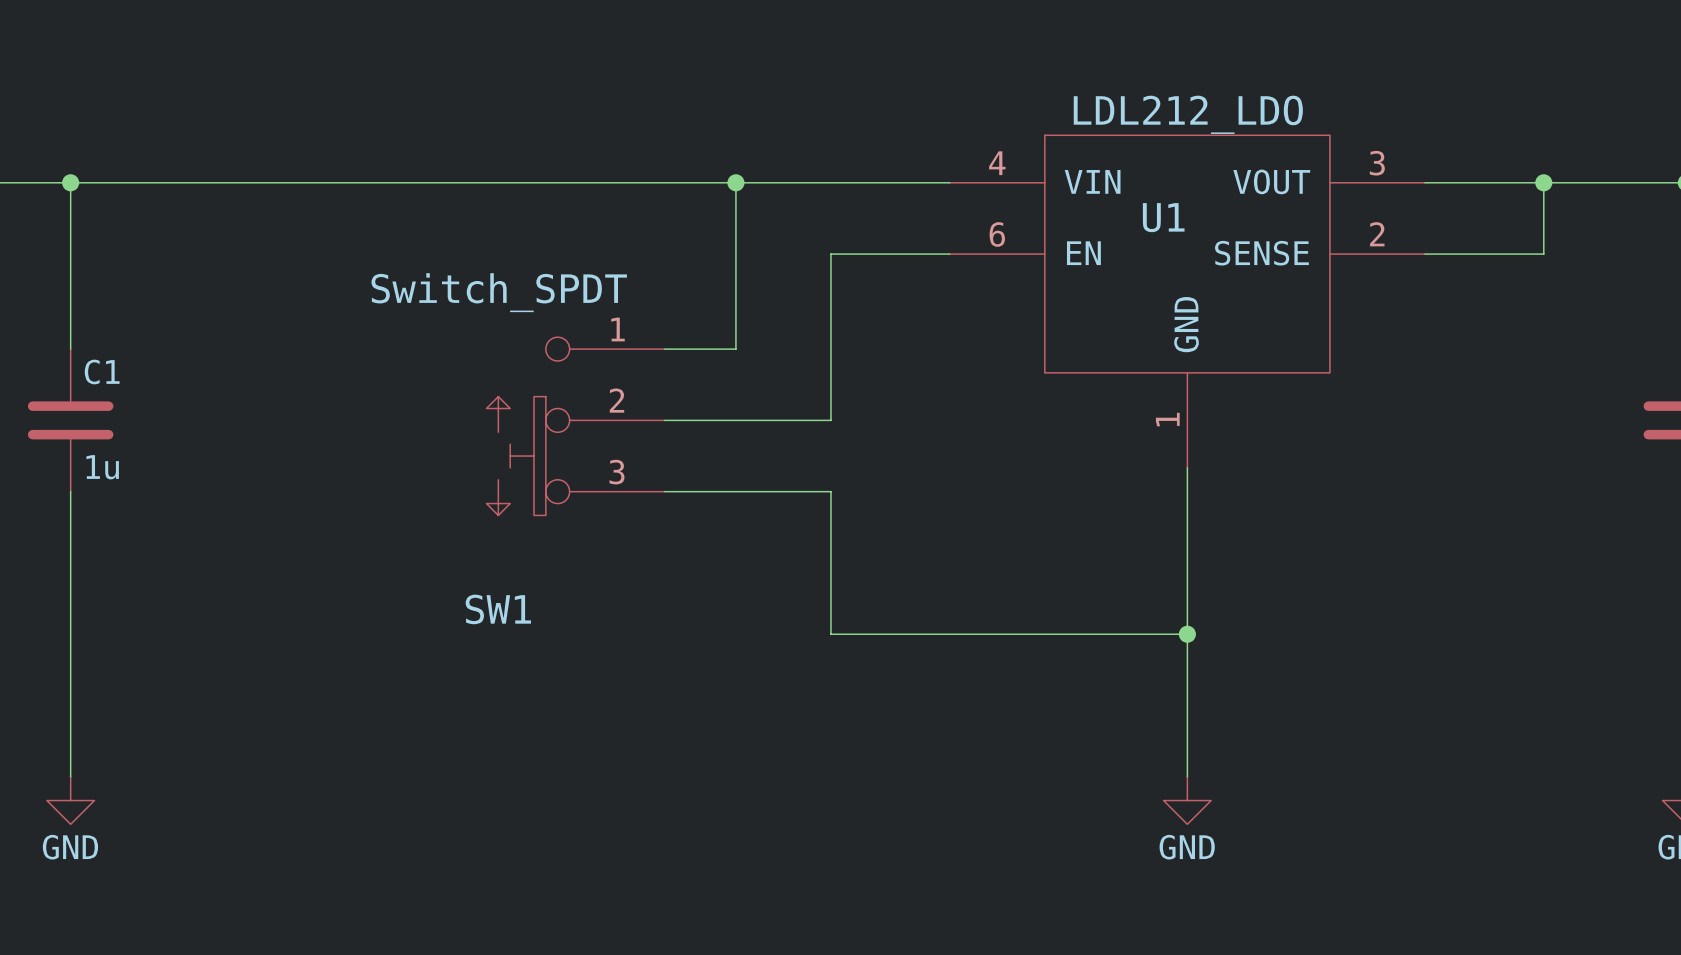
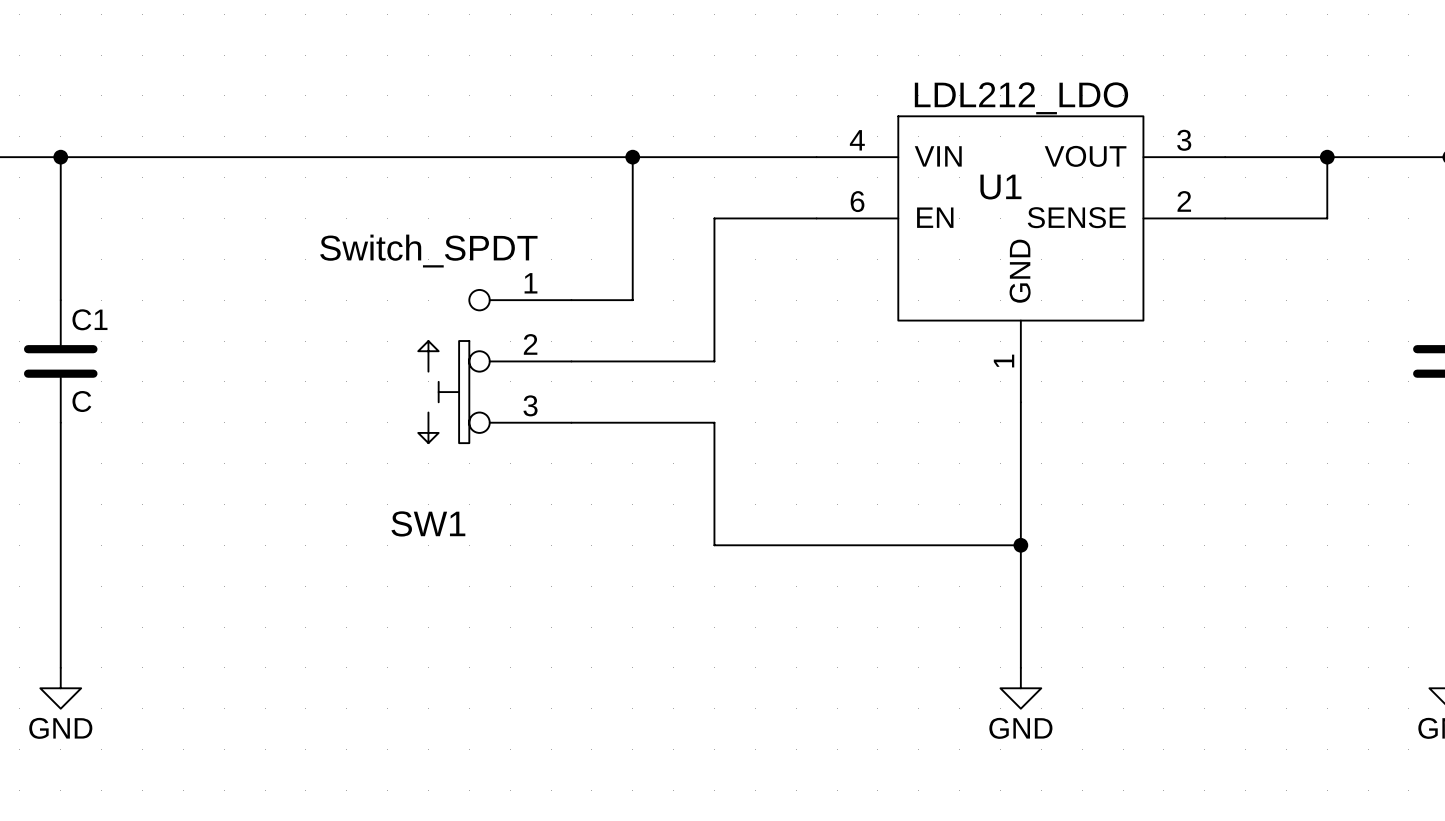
C1 value: 1u (102, 467) -> C (81, 401)

